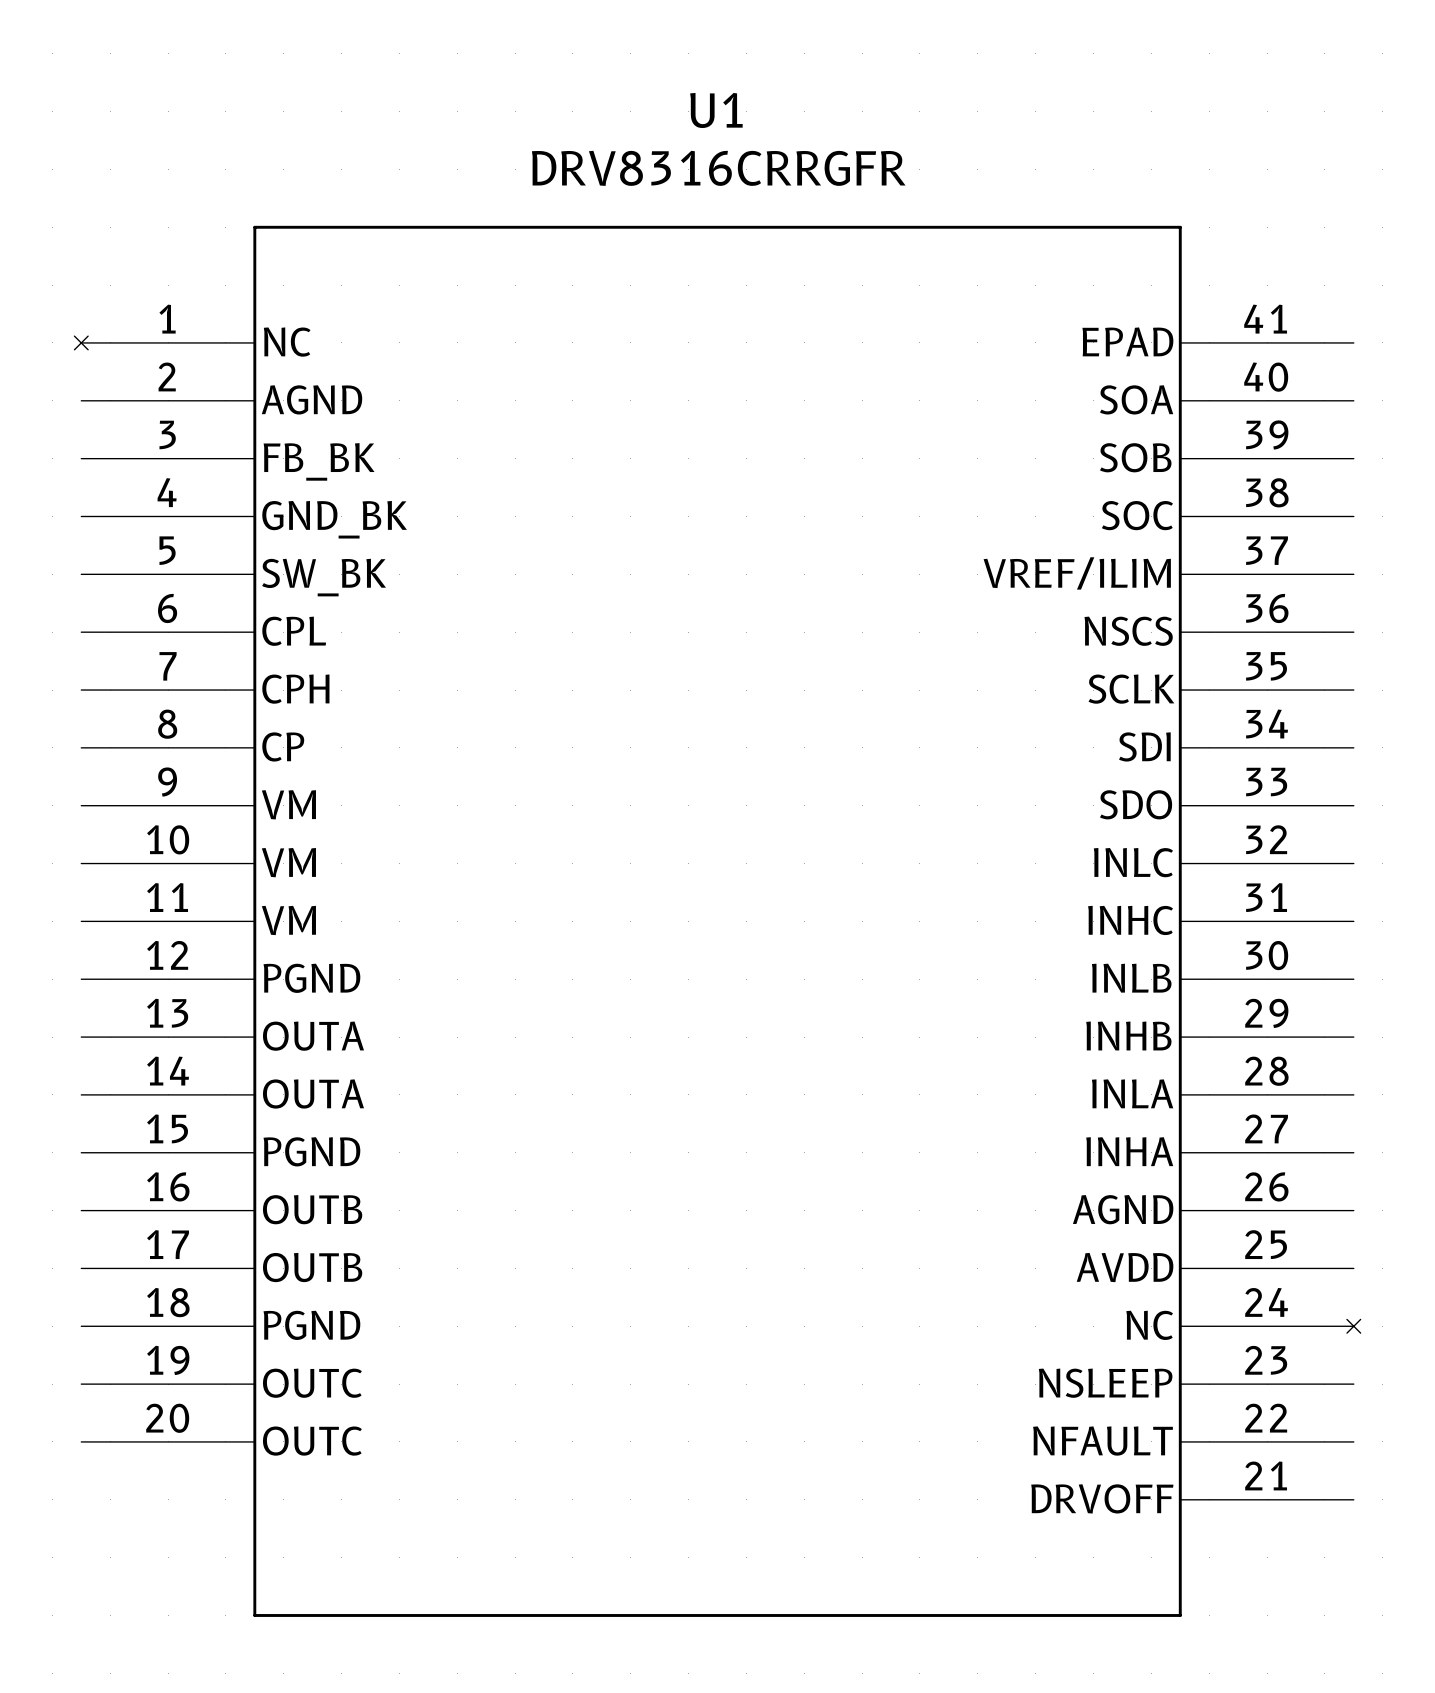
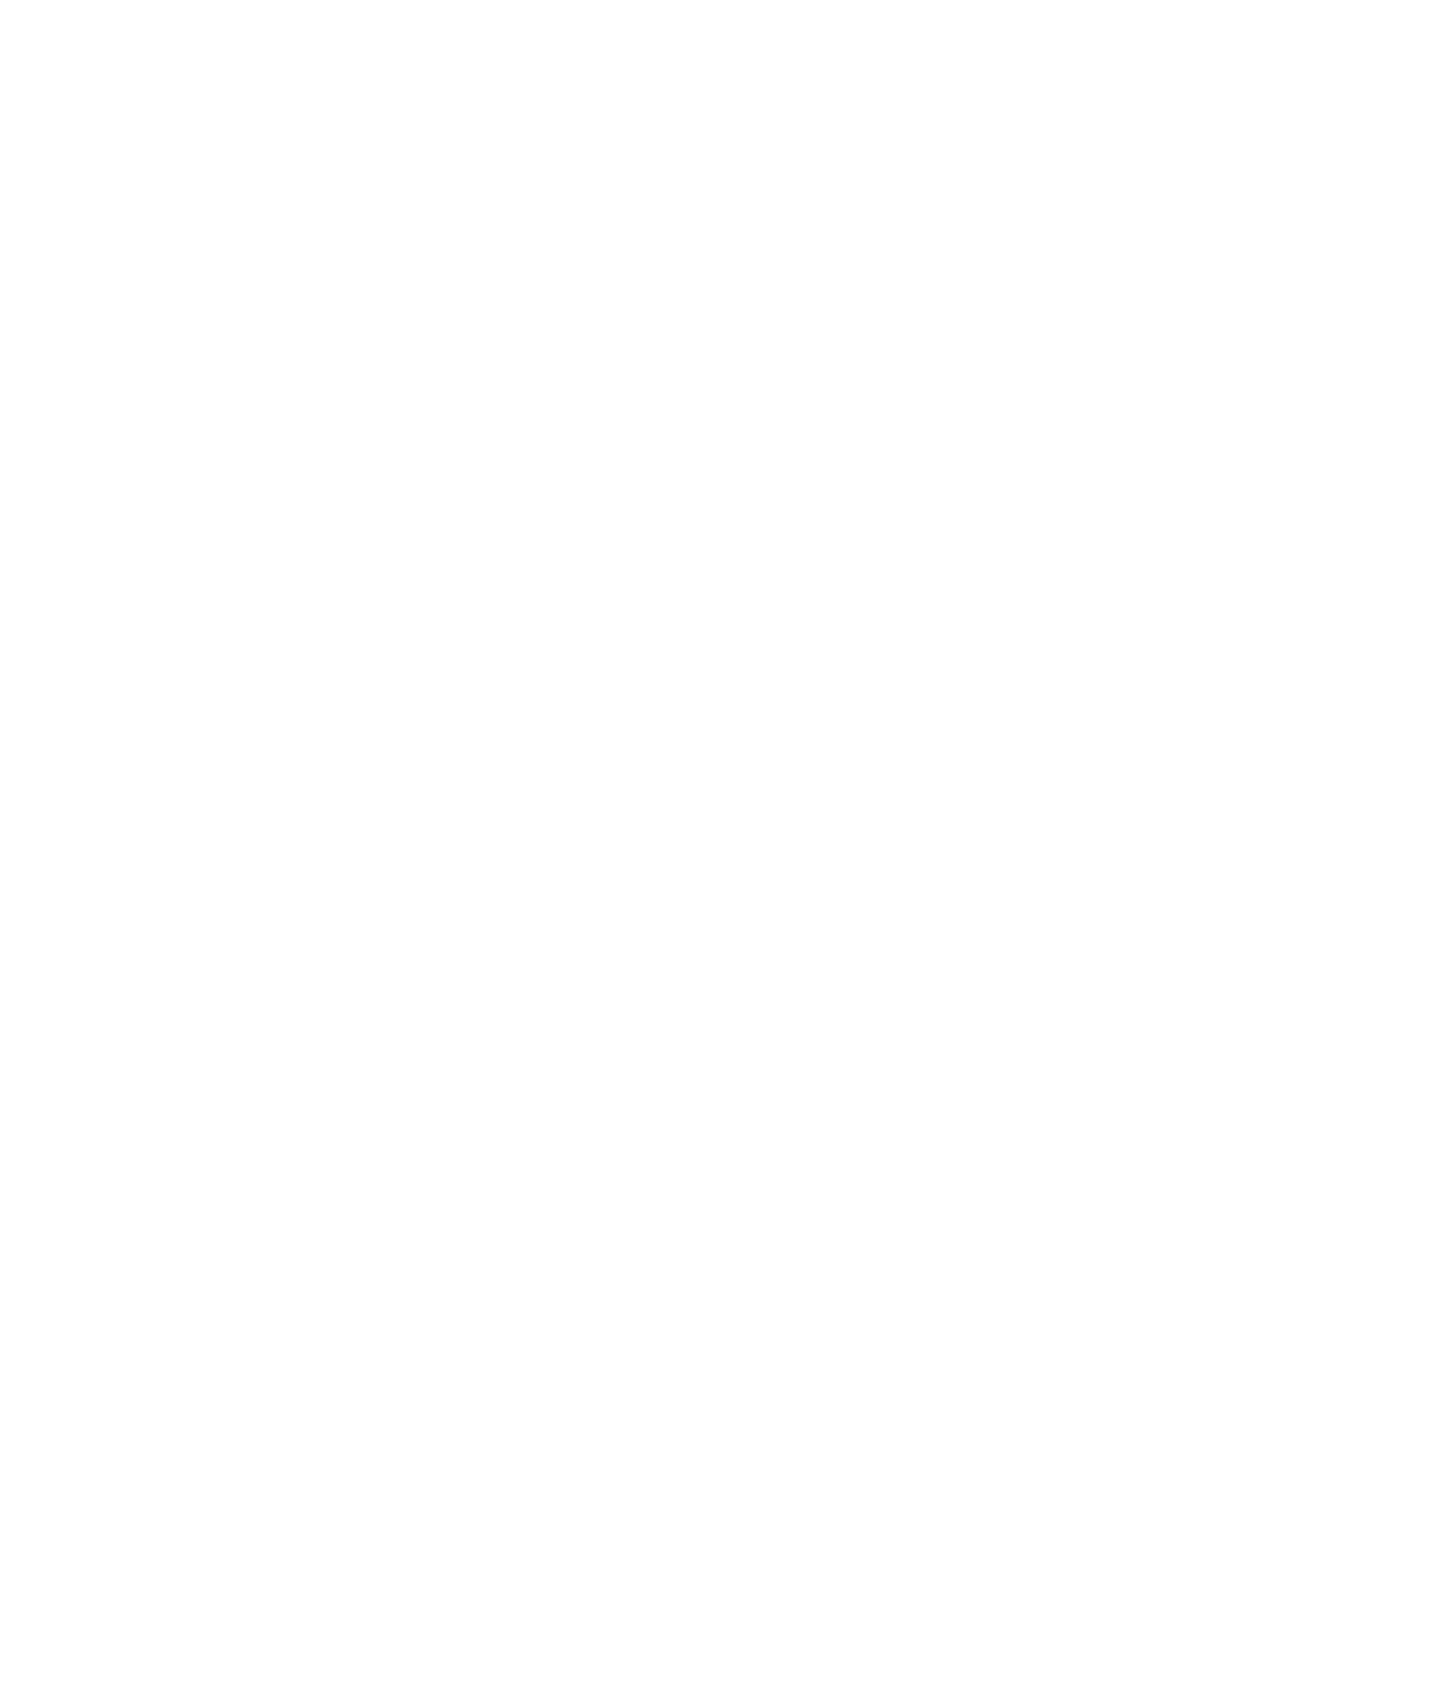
U1: DRV8316CRRGFR (717, 921) -> none

